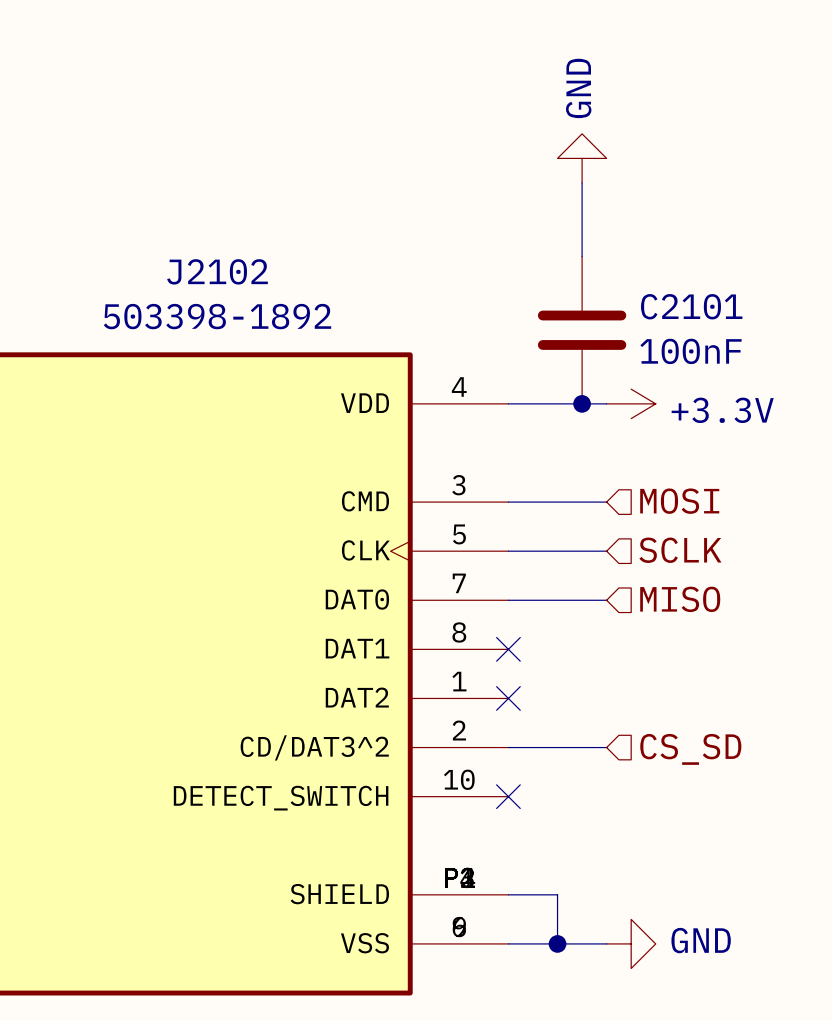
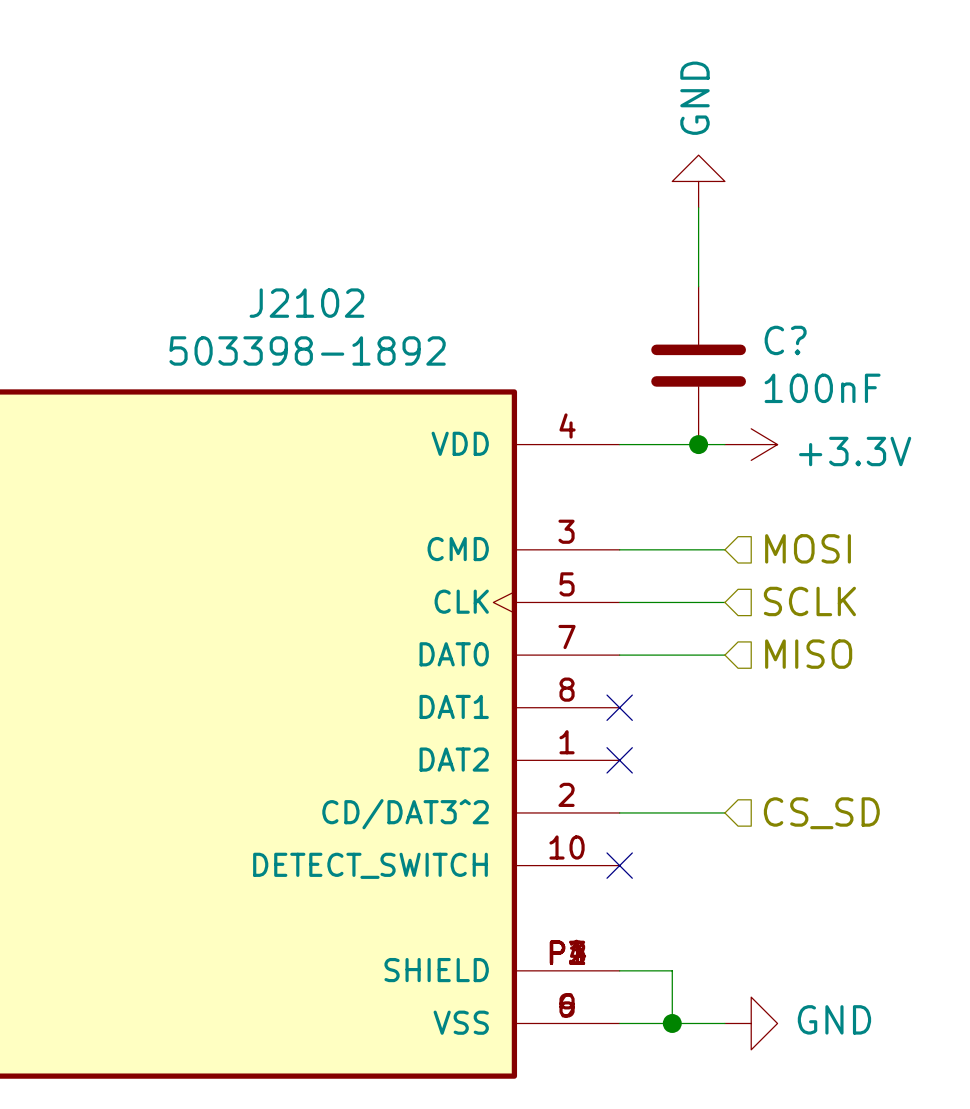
C2101 name: C2101 (691, 306) -> C? (785, 340)

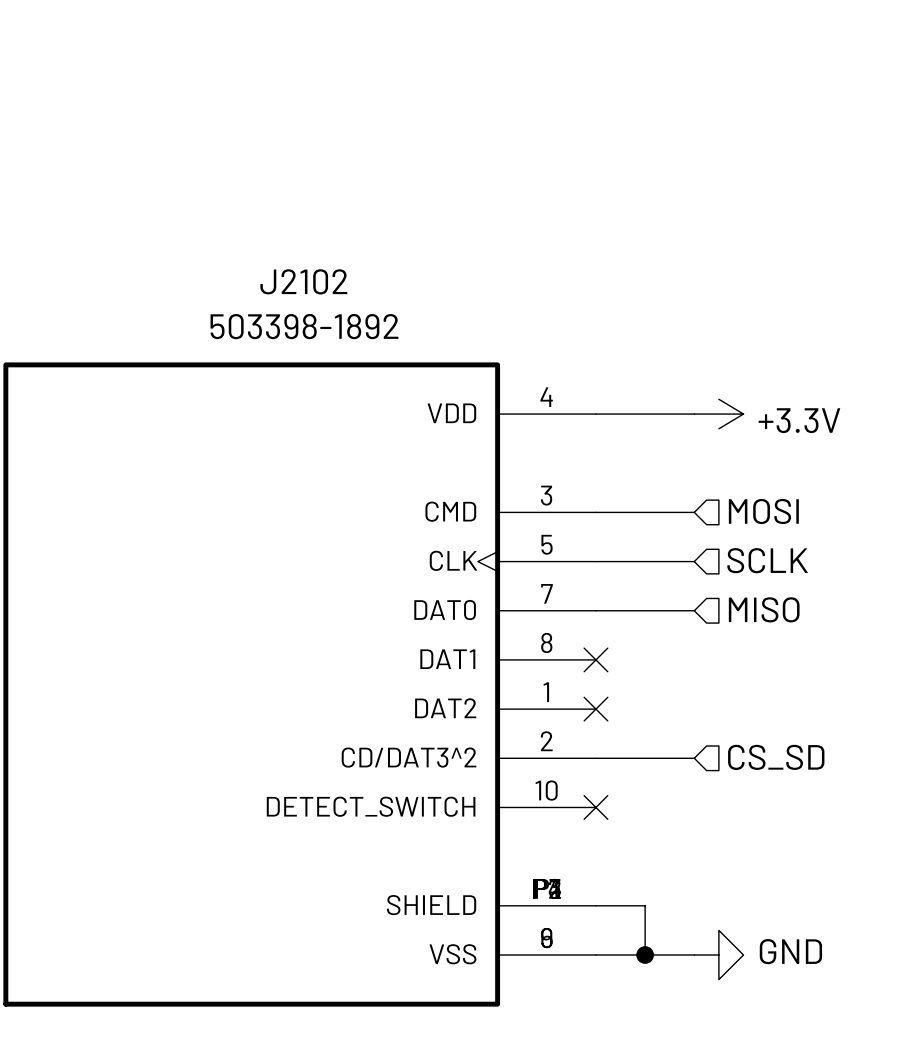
power symbol: GND (698, 181) -> none
wire: (698, 207) (698, 286) -> none
C?: 100nF (698, 365) -> none
junction: (698, 444) -> none

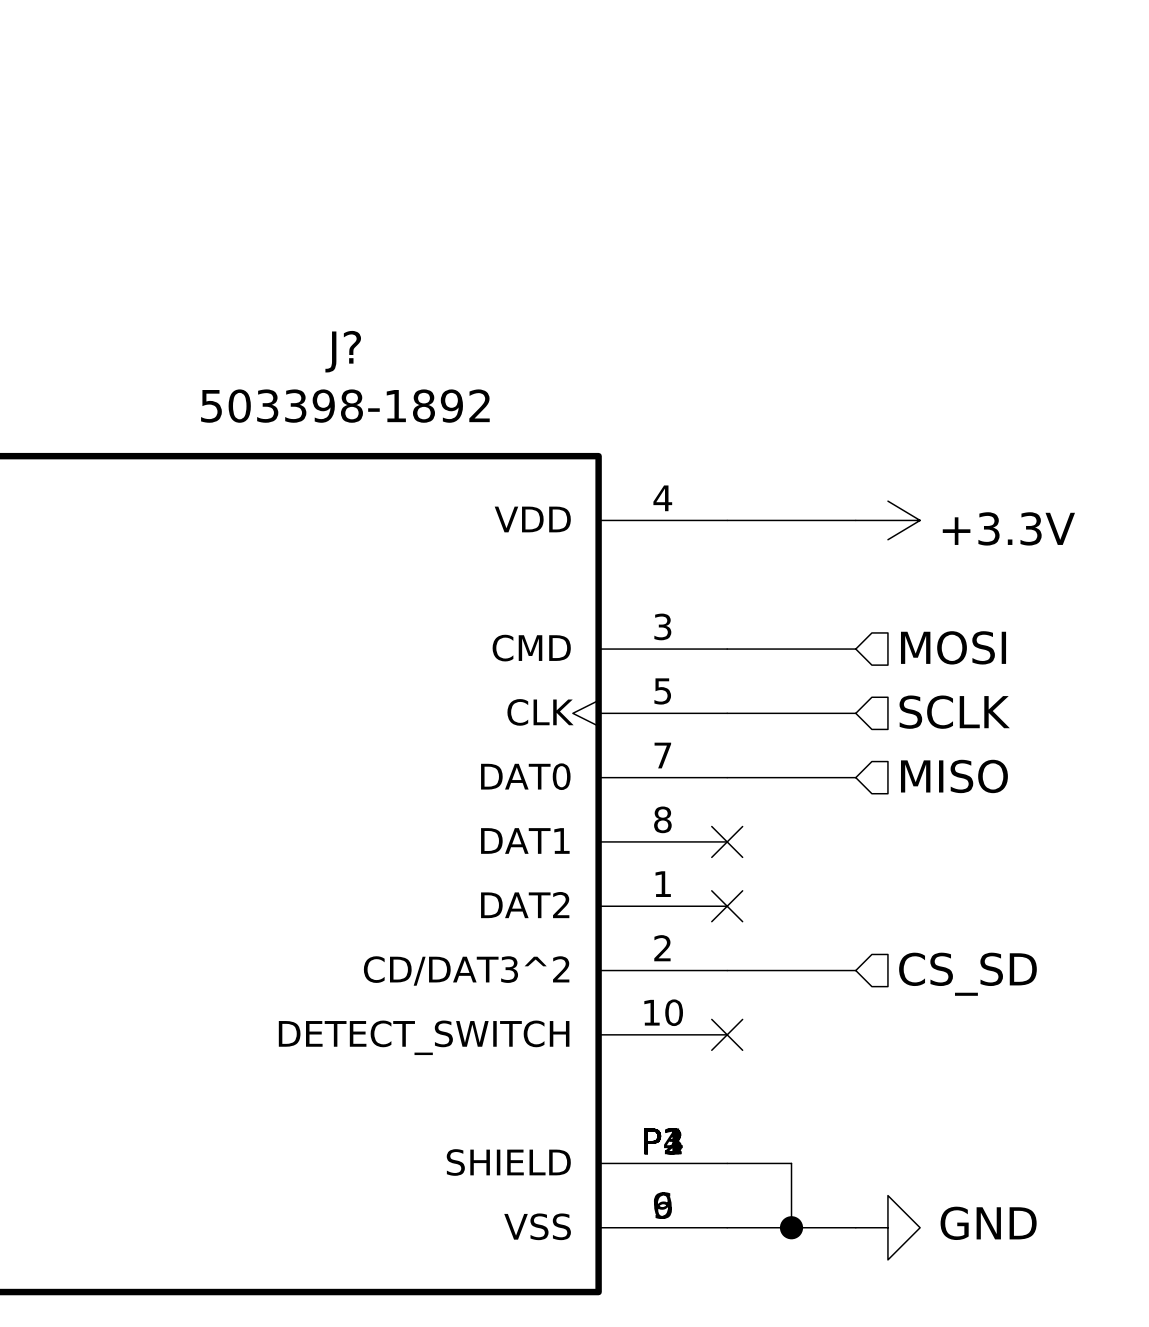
J2102 name: J2102 (303, 281) -> J? (343, 351)

